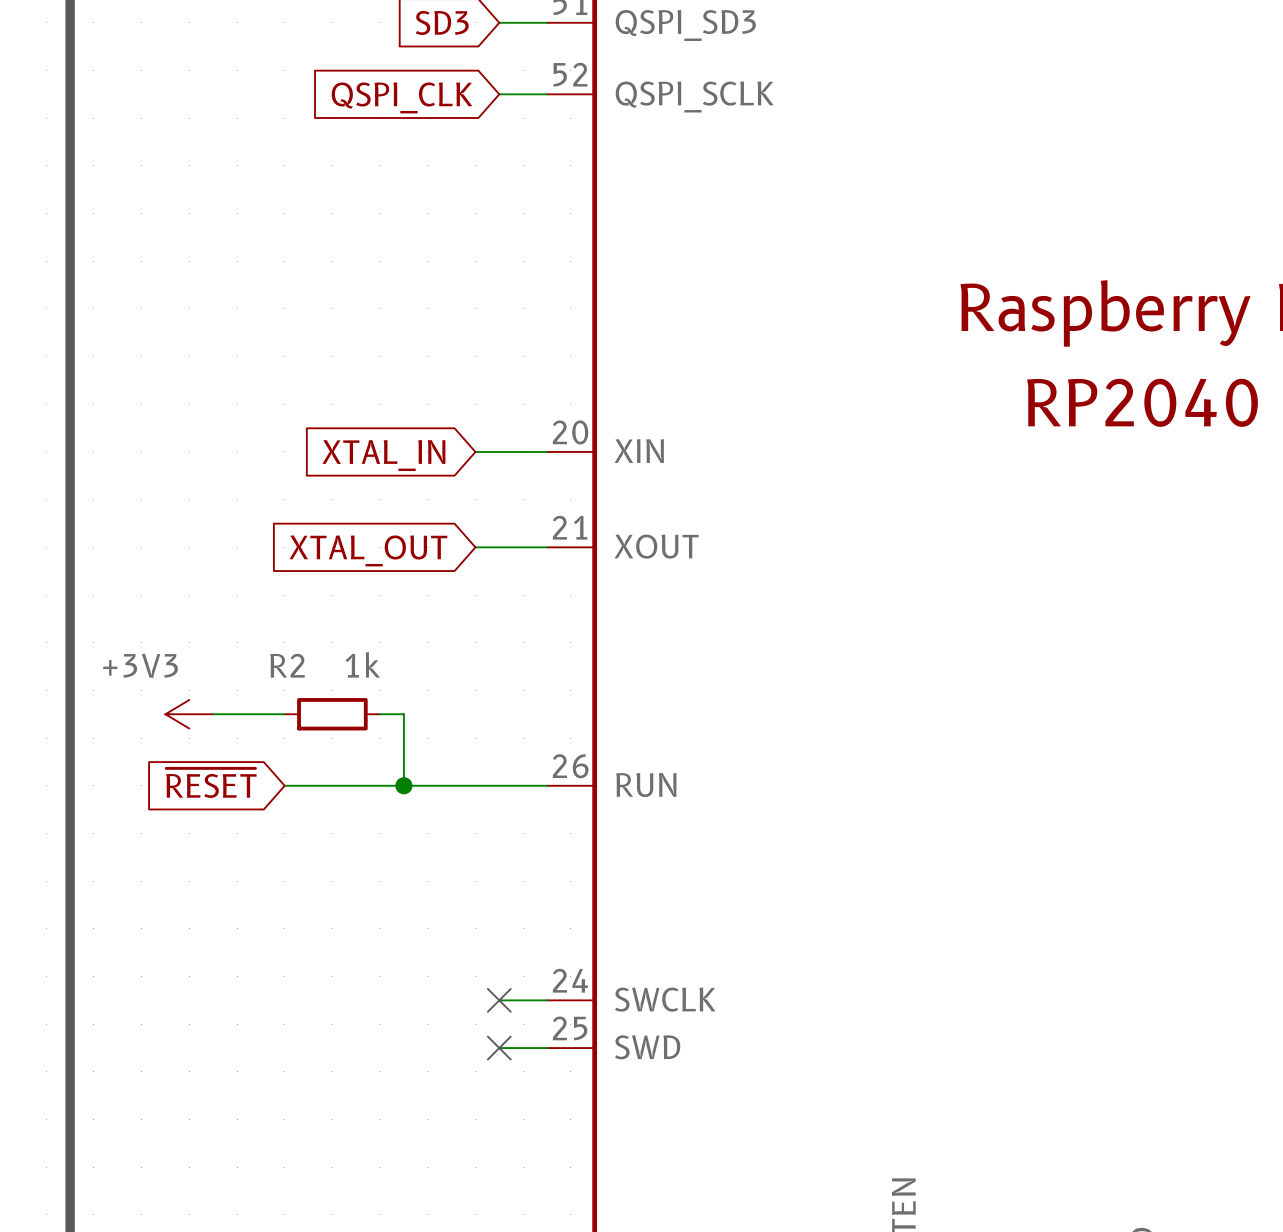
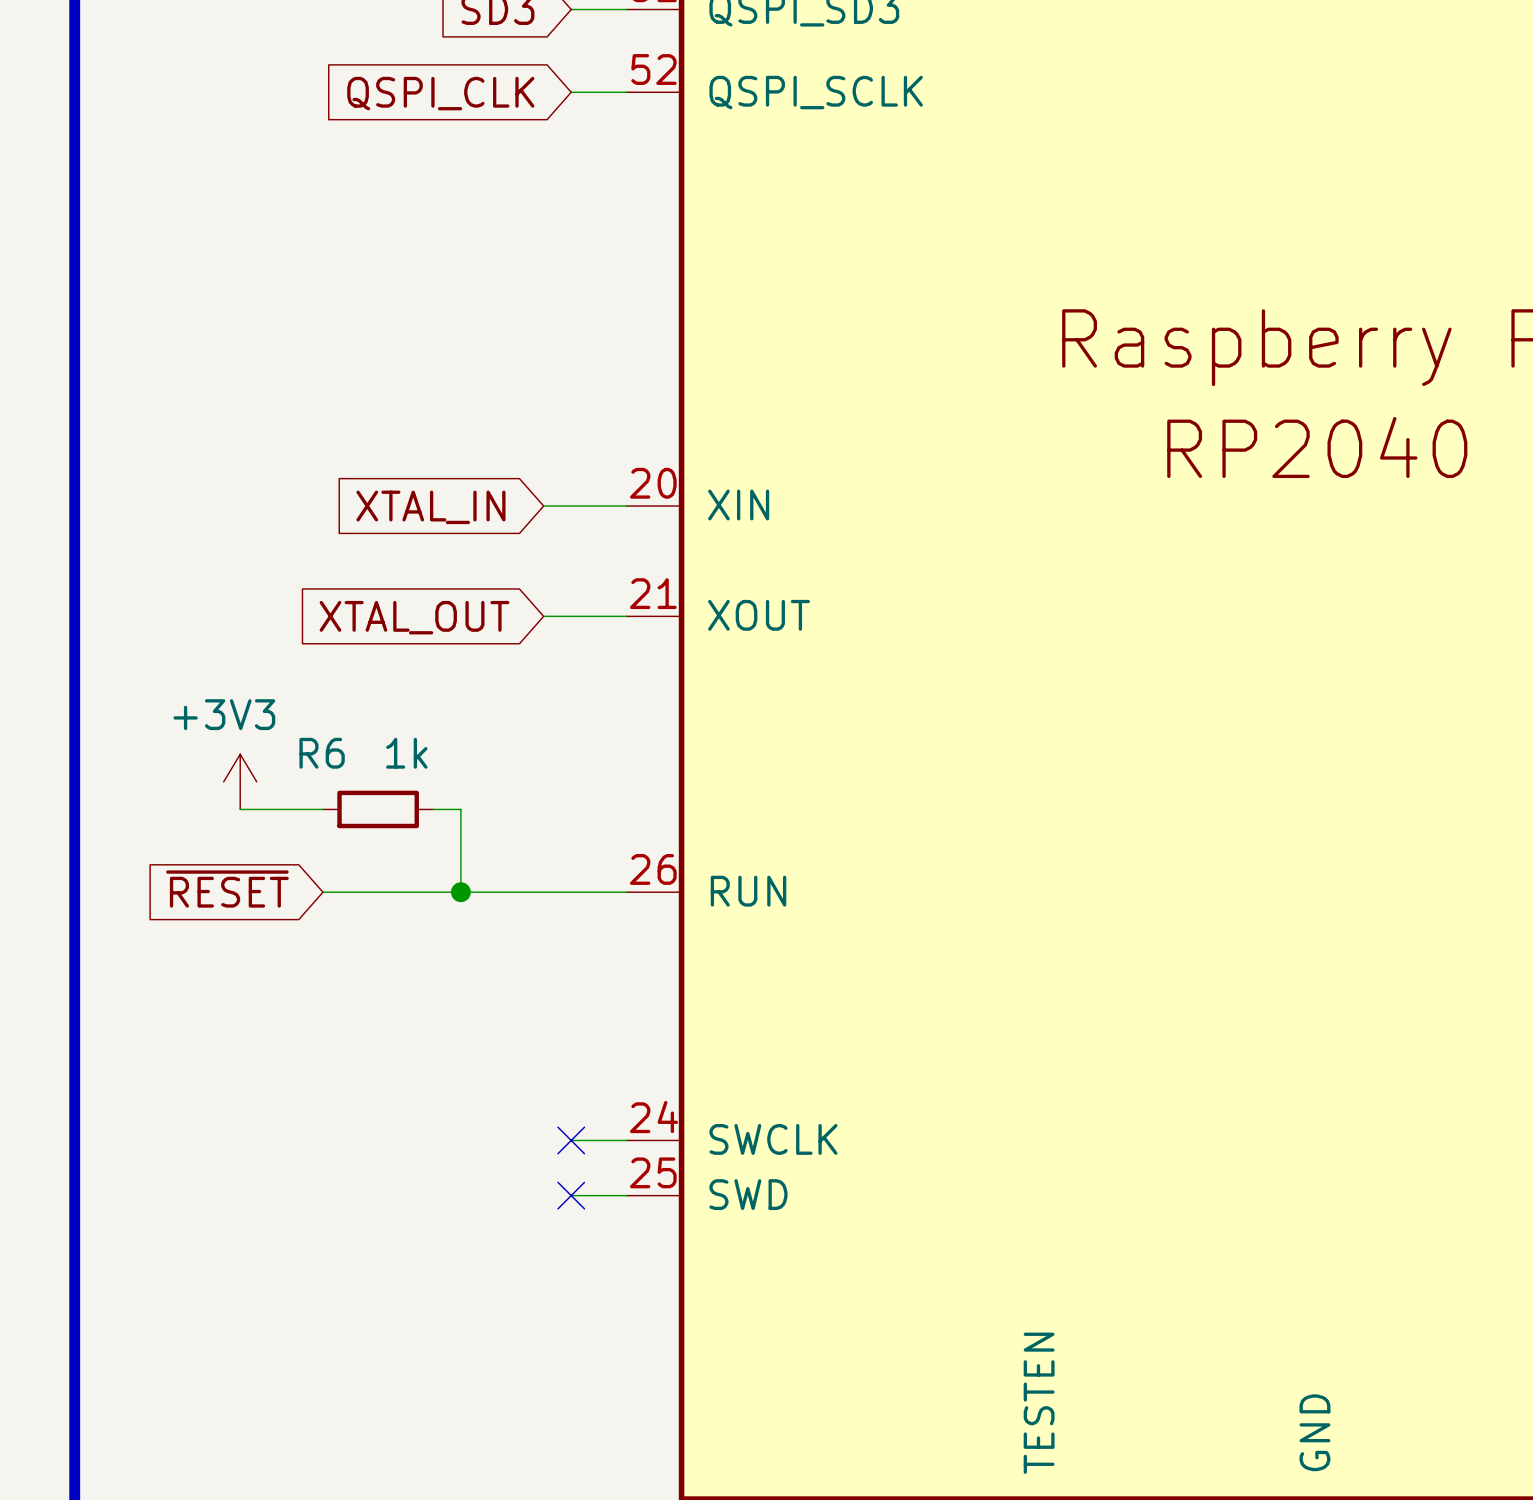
R2 name: R2 (287, 665) -> R6 (322, 753)
power symbol rotation: 0° (189, 714) -> 90° clockwise (240, 781)
power symbol position: +3V3 (189, 714) -> +3V3 (240, 781)

